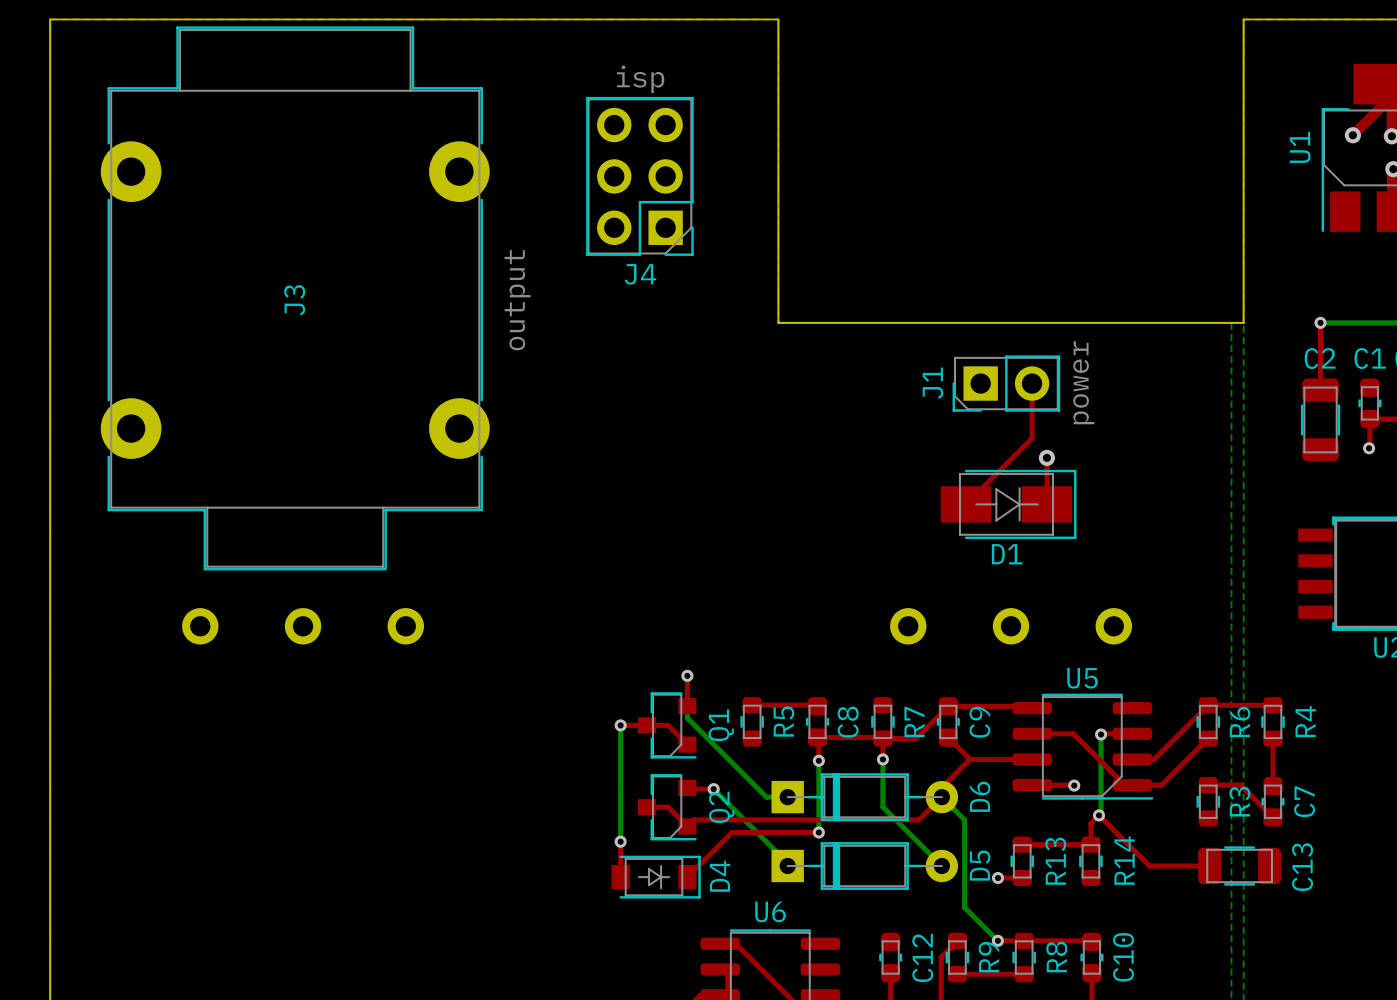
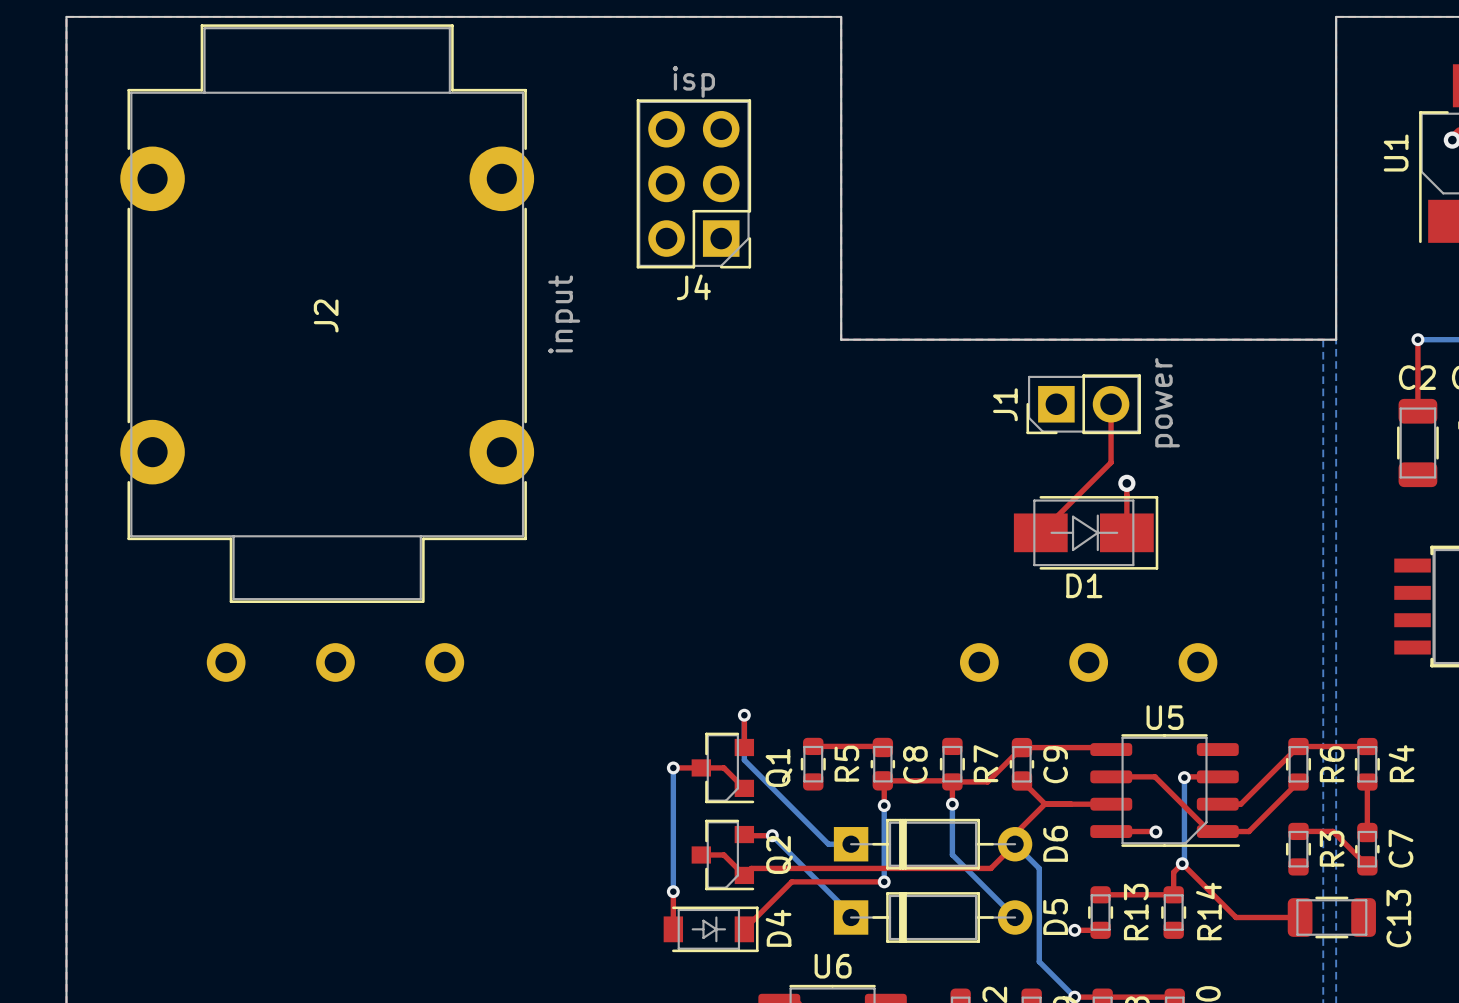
J3 name: J3 (294, 300) -> J2 (326, 315)
J3 value: output (517, 300) -> input (564, 314)

